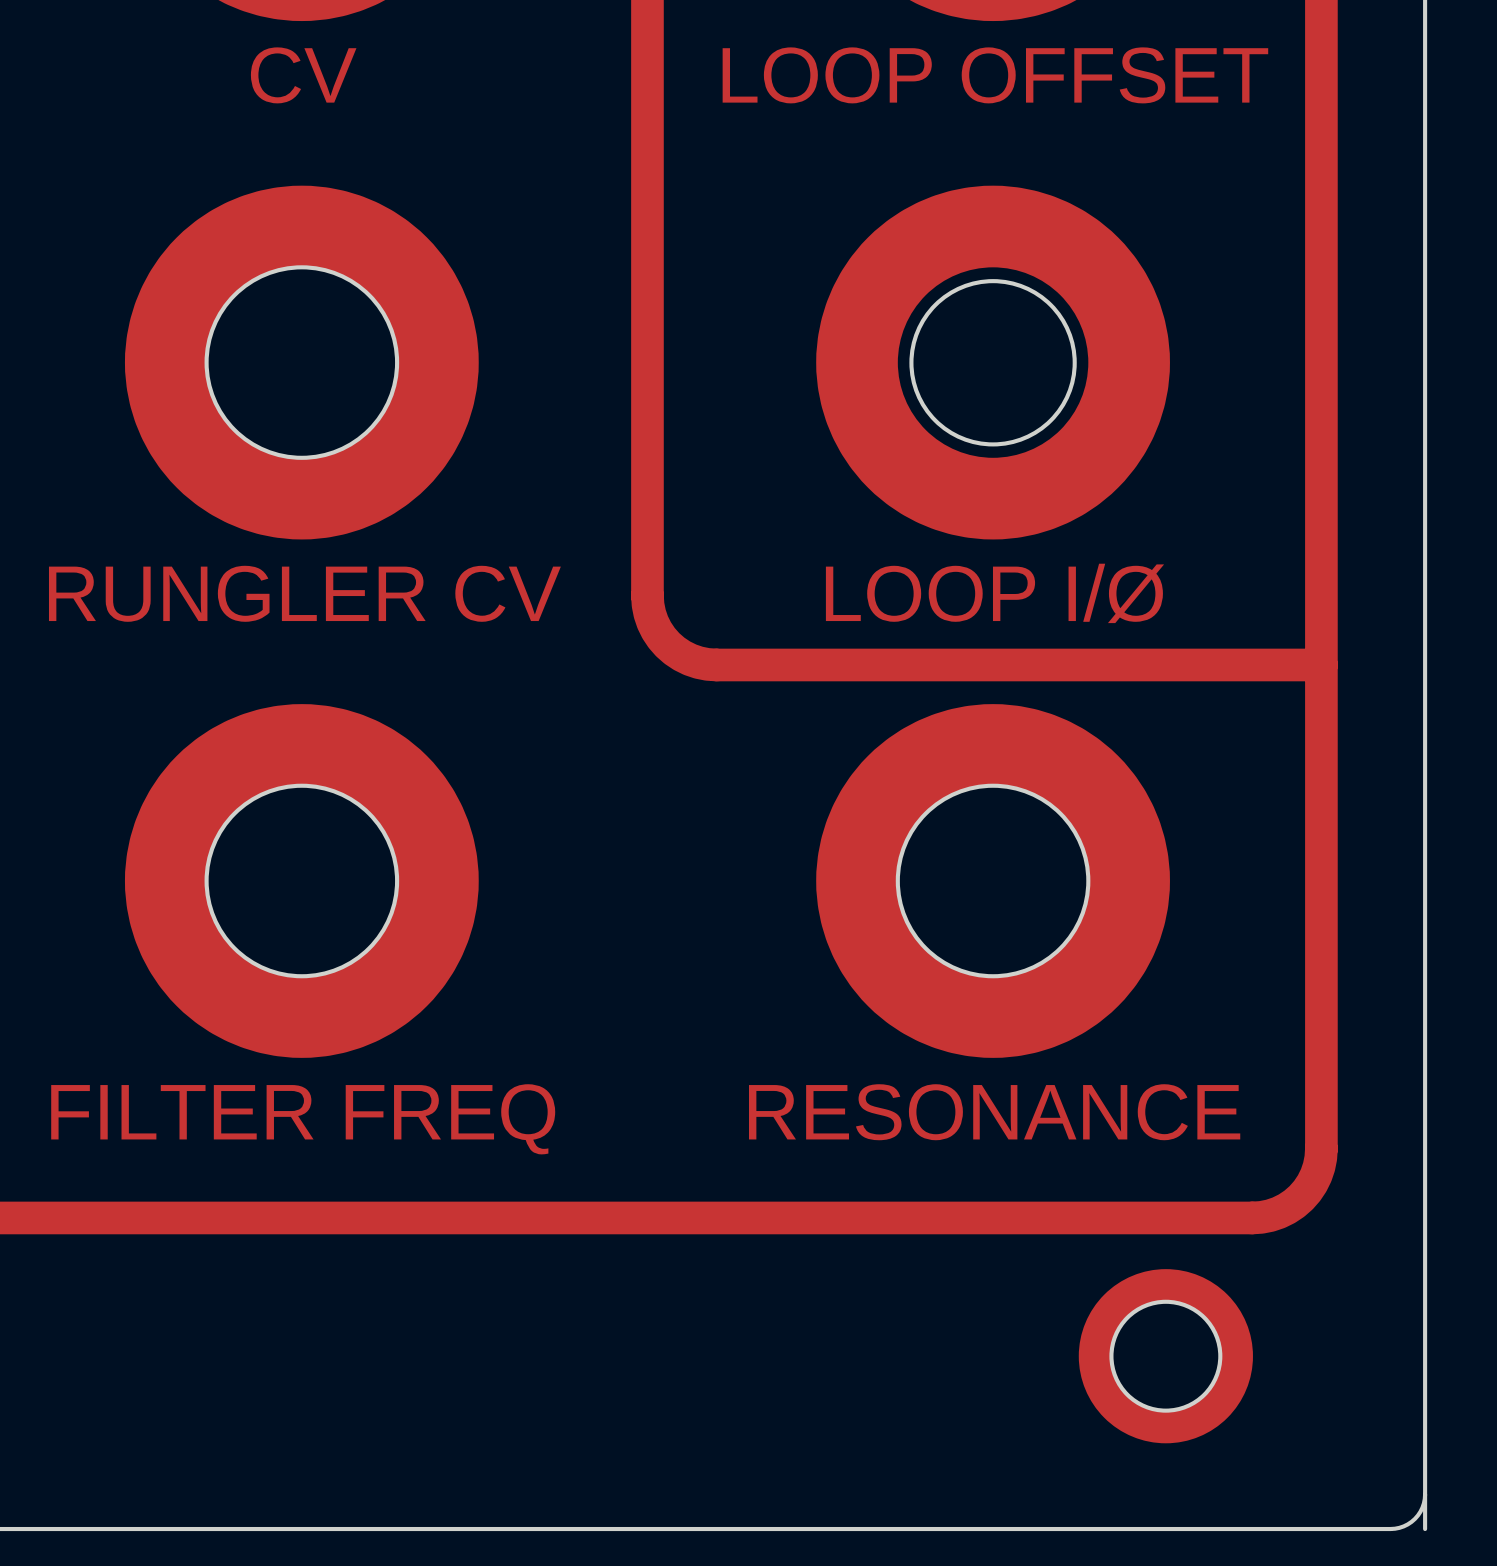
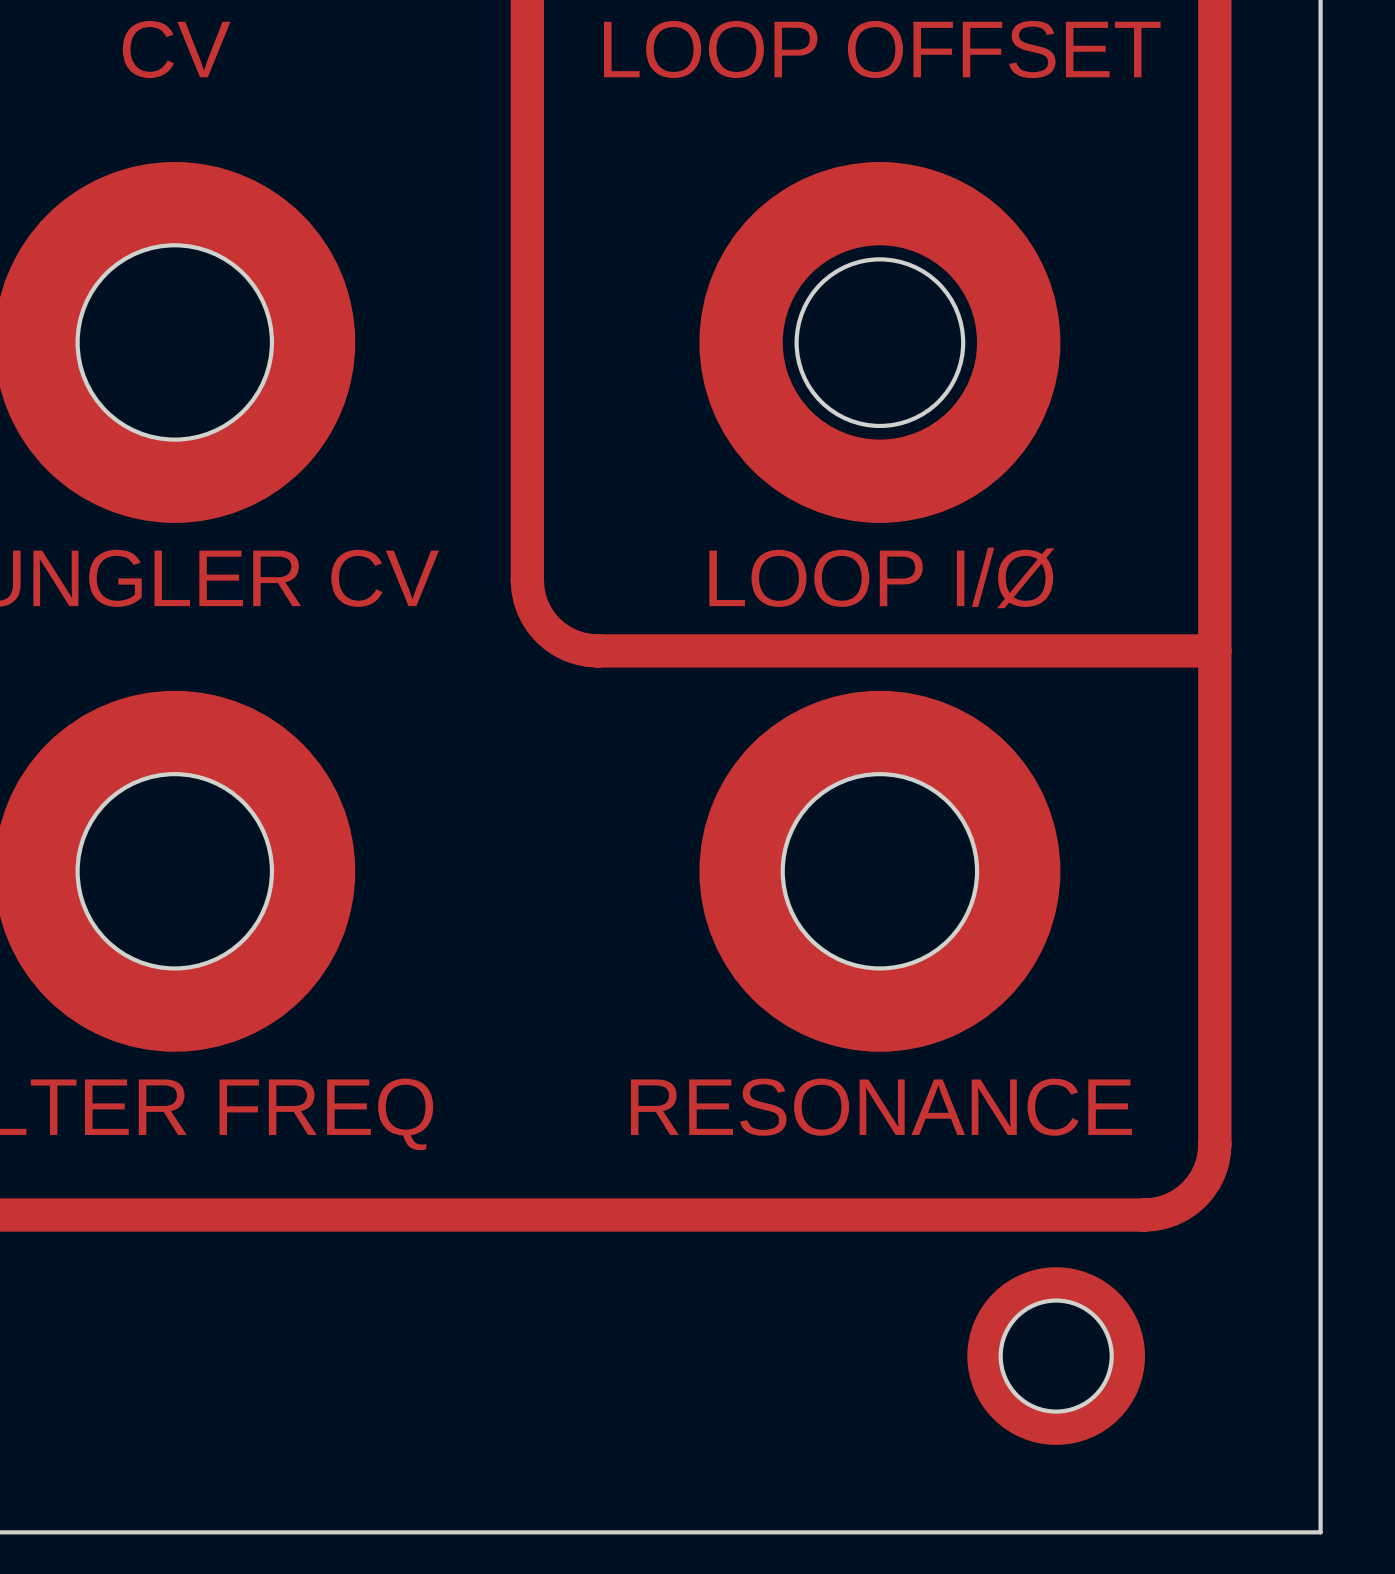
board edge: (1425, 1494) (1422, 1507) (1414, 1518) (1403, 1526) (1390, 1529) -> (1320, 1532) (1285, 1532)

